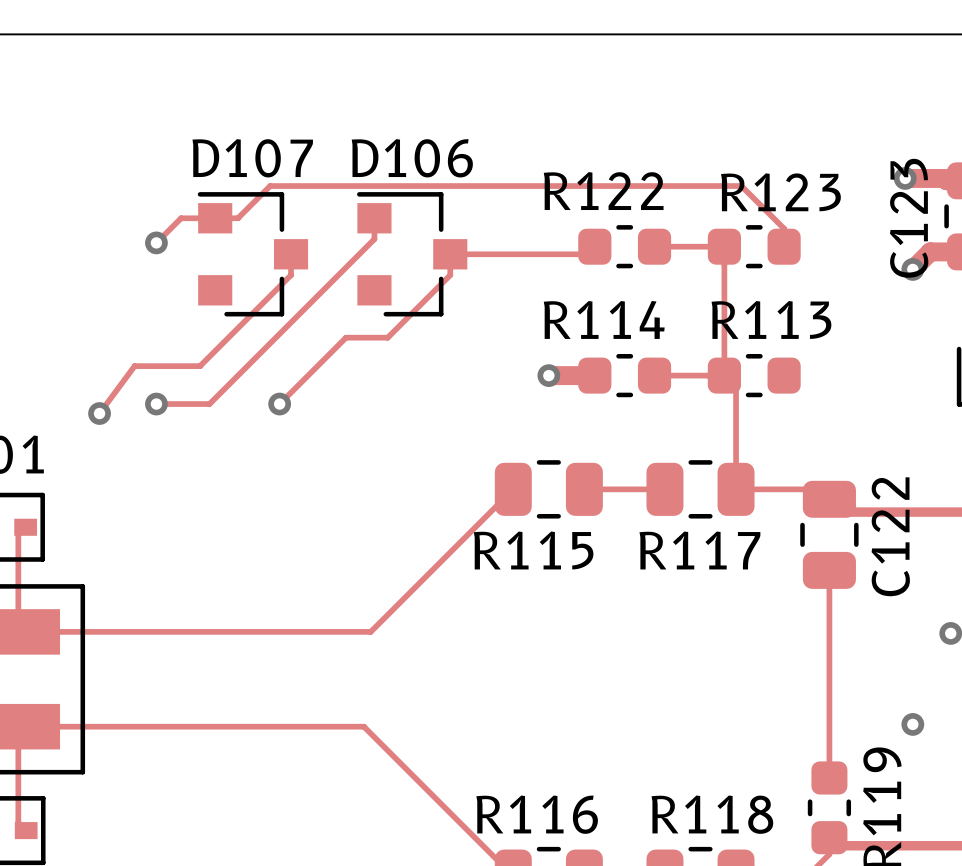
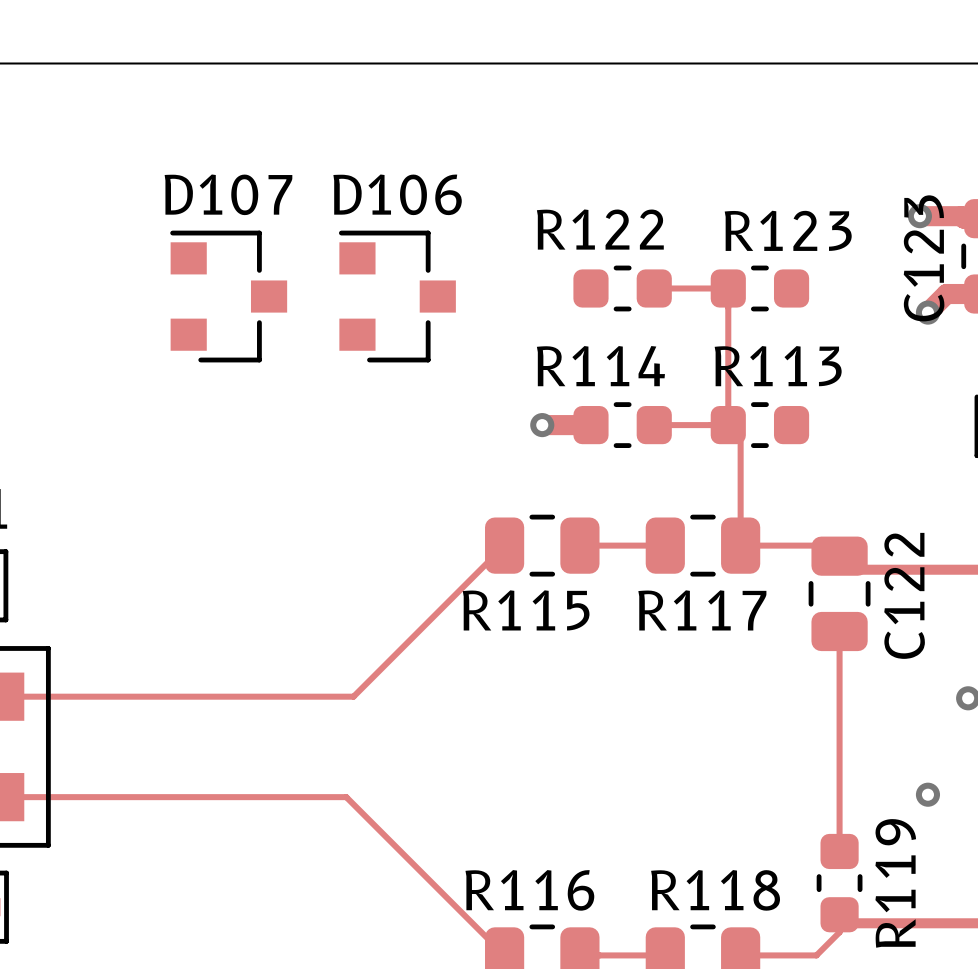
track: (374, 218) (374, 239) (209, 404) (156, 404) -> none
track: (156, 242) (181, 218) (237, 218) (270, 186) (741, 186) (784, 228) (784, 246) -> none
via: (156, 242) -> none
track: (594, 246) (587, 254) (450, 254) (450, 275) (387, 337) (346, 337) (279, 404) -> none
track: (291, 254) (291, 275) (200, 366) (134, 366) (99, 413) -> none
via: (156, 404) -> none
via: (279, 404) -> none
via: (99, 413) -> none

